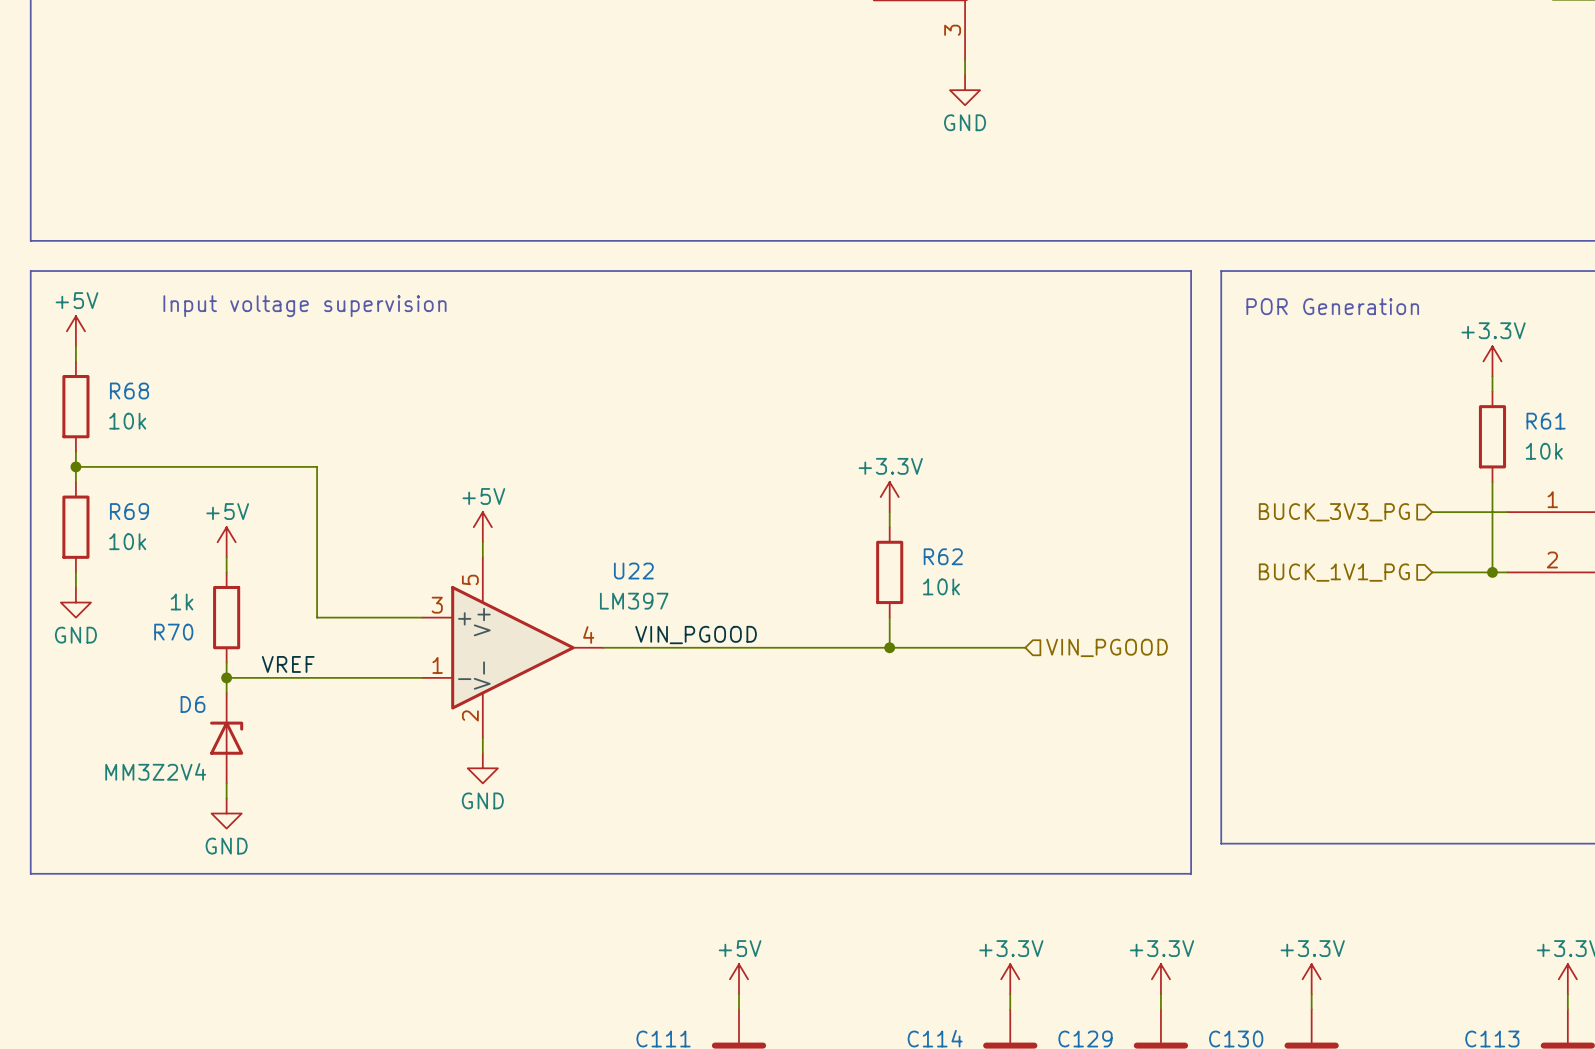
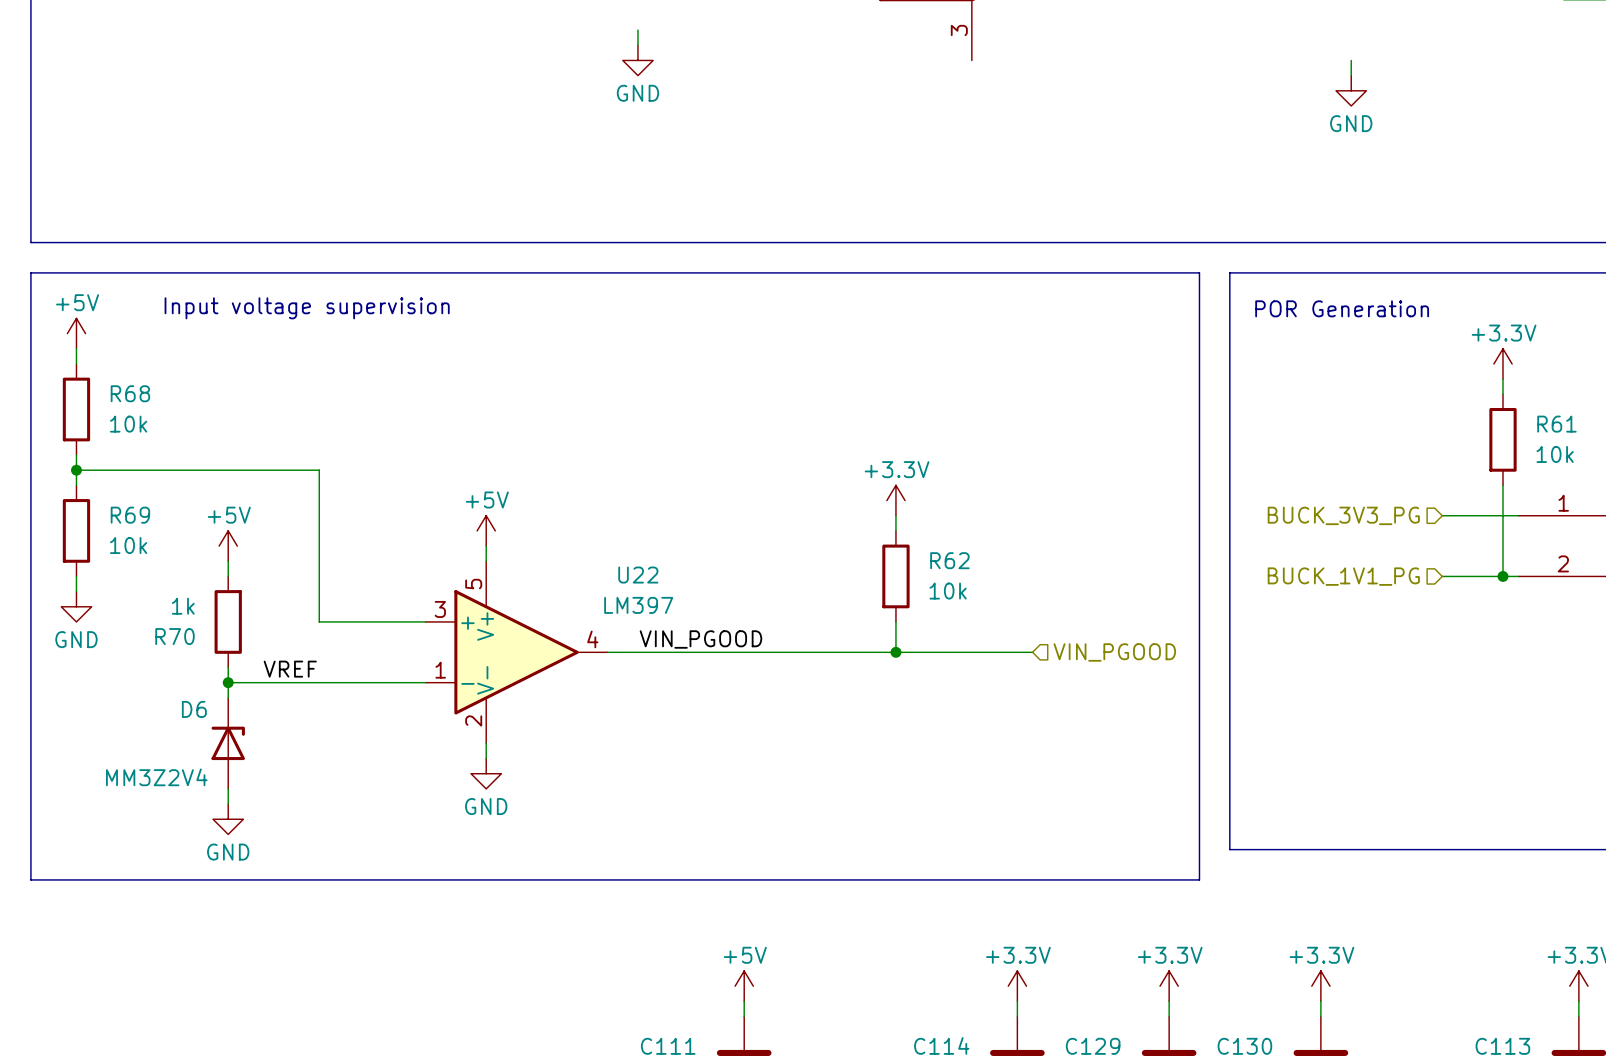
wire: none -> (637, 30) (637, 45)
power symbol: none -> GND (637, 60)
wire: (965, 60) (965, 75) -> none
wire: none -> (1351, 60) (1351, 75)
power symbol: GND (965, 90) -> none
power symbol: none -> GND (1351, 90)

